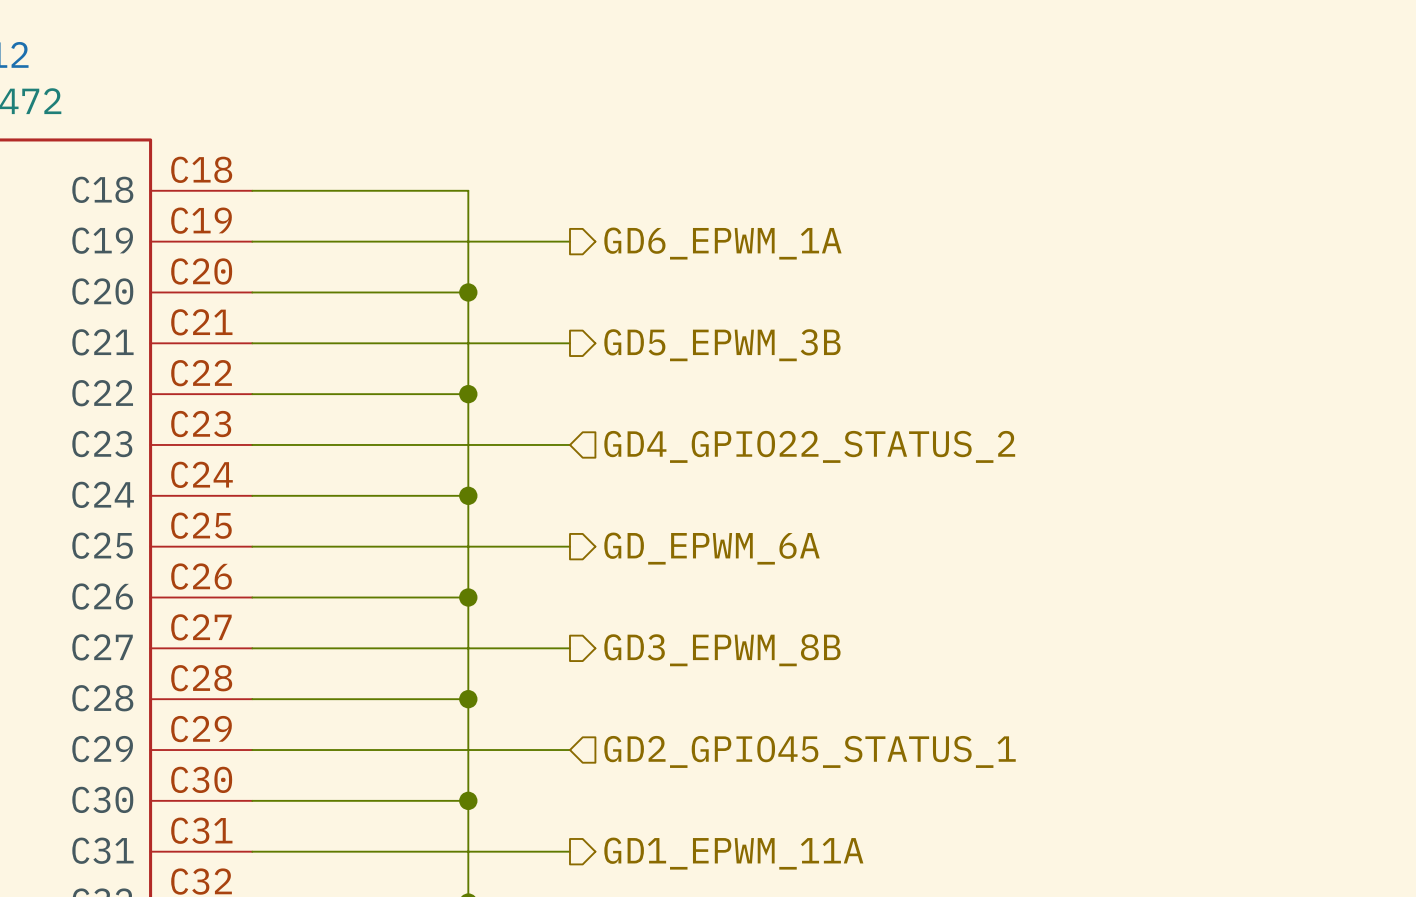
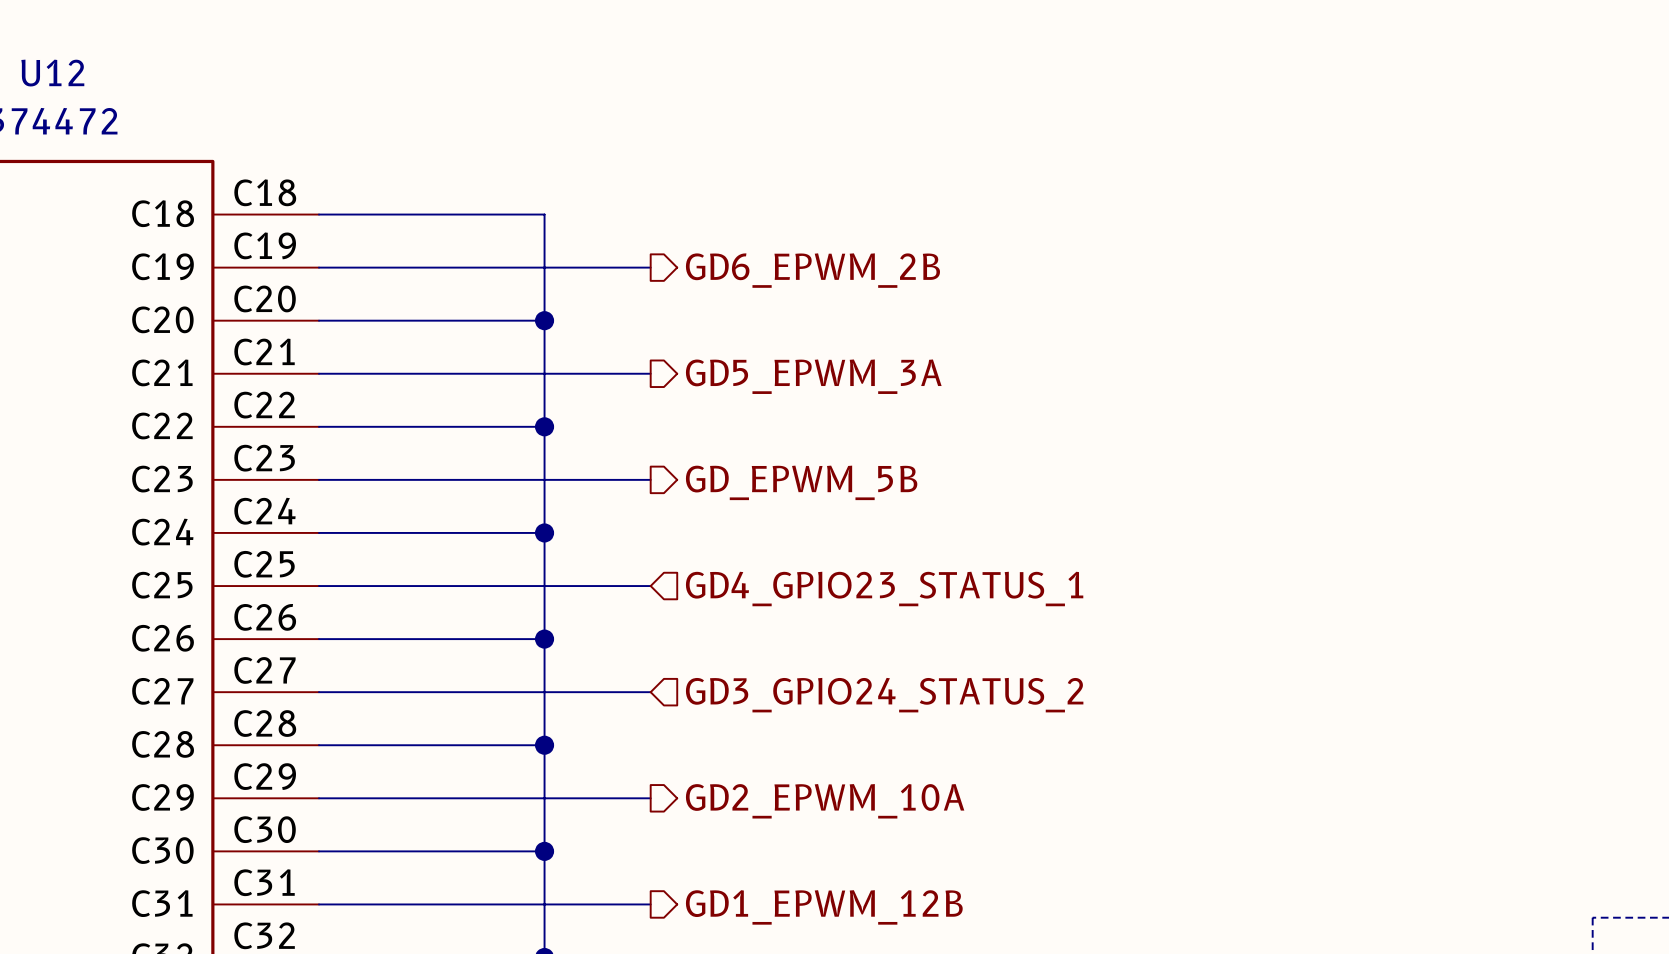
hierarchical label: GD6_EPWM_1A (722, 243) -> GD6_EPWM_2B (812, 270)
hierarchical label: GD5_EPWM_3B (722, 345) -> GD5_EPWM_3A (813, 376)
hierarchical label shape: input (809, 446) -> output (801, 482)
hierarchical label: GD4_GPIO22_STATUS_2 (809, 446) -> GD_EPWM_5B (801, 482)
hierarchical label shape: output (712, 548) -> input (884, 589)
hierarchical label: GD_EPWM_6A (712, 548) -> GD4_GPIO23_STATUS_1 (884, 589)
hierarchical label shape: output (722, 650) -> input (884, 695)
hierarchical label: GD3_EPWM_8B (722, 650) -> GD3_GPIO24_STATUS_2 (884, 695)
hierarchical label shape: input (810, 751) -> output (825, 801)
hierarchical label: GD2_GPIO45_STATUS_1 (810, 751) -> GD2_EPWM_10A (825, 801)
hierarchical label: GD1_EPWM_11A (733, 853) -> GD1_EPWM_12B (824, 907)

